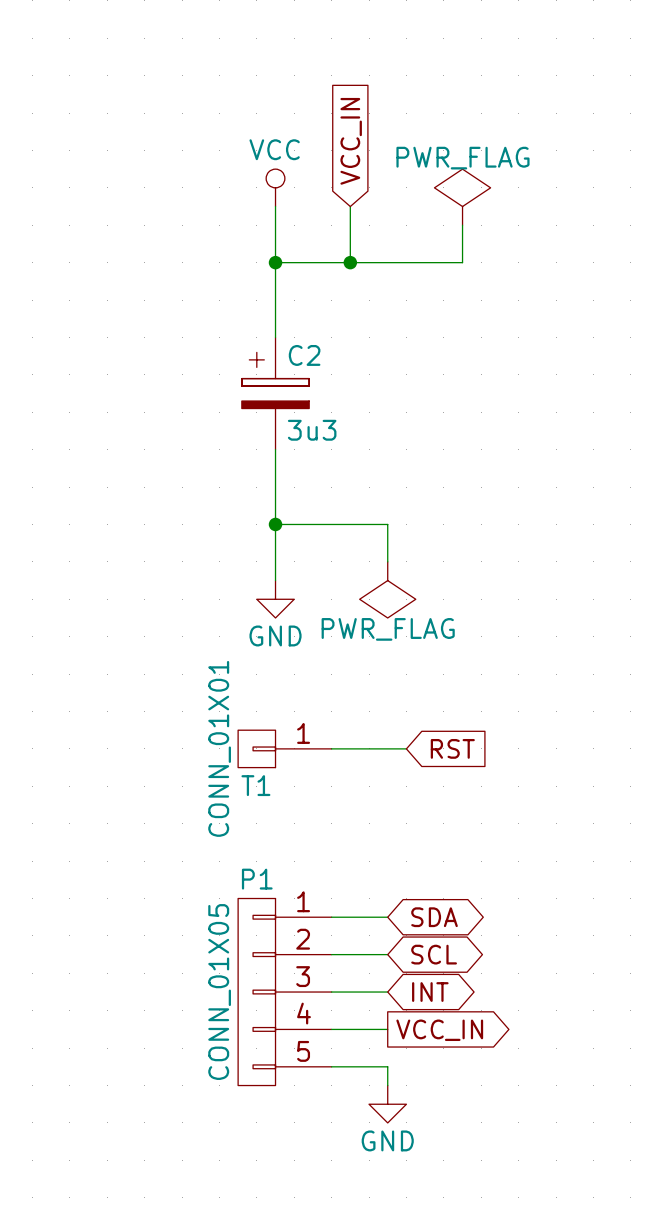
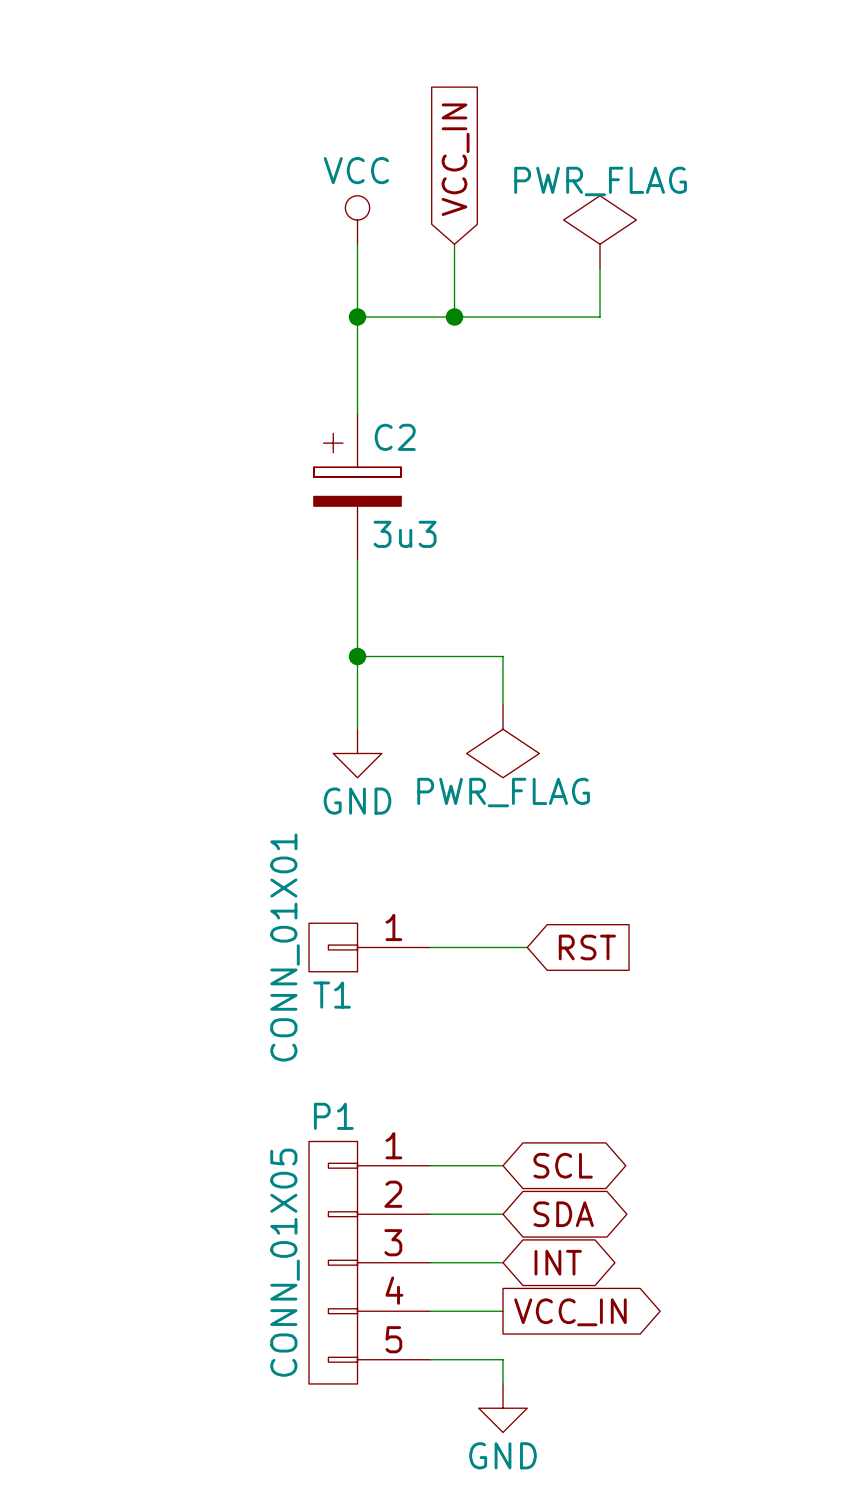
global label: SDA (434, 917) -> SCL (563, 1165)
global label: SCL (434, 954) -> SDA (563, 1214)

